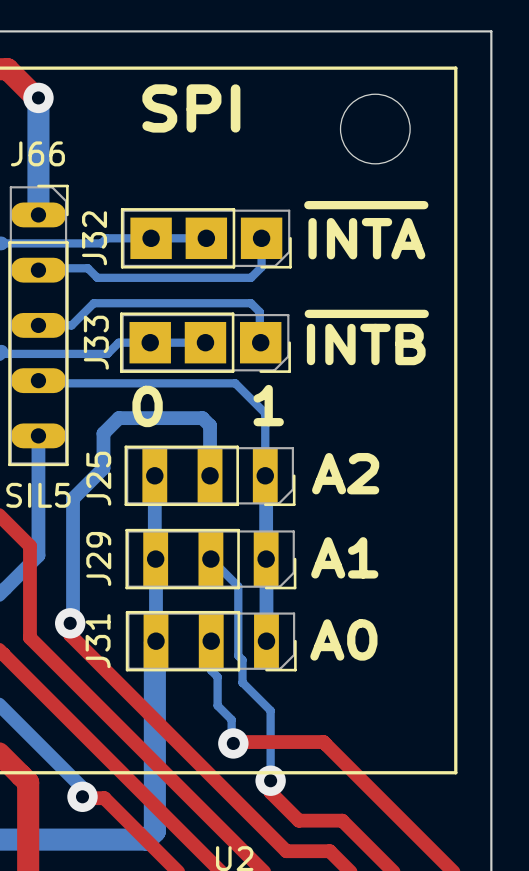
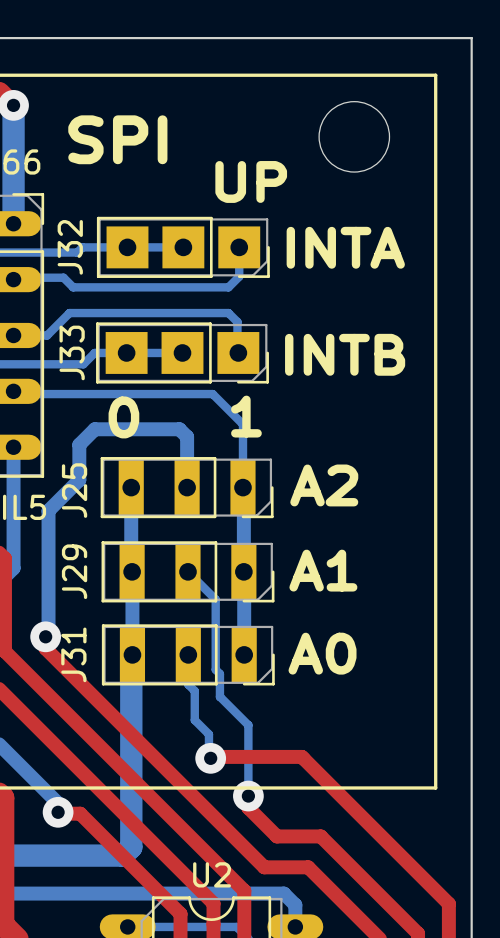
text position: SPI (191, 108) -> SPI (117, 139)
text: none -> UP (251, 181)
line: (308, 205) (424, 205) -> none
line: (308, 313) (424, 313) -> none

